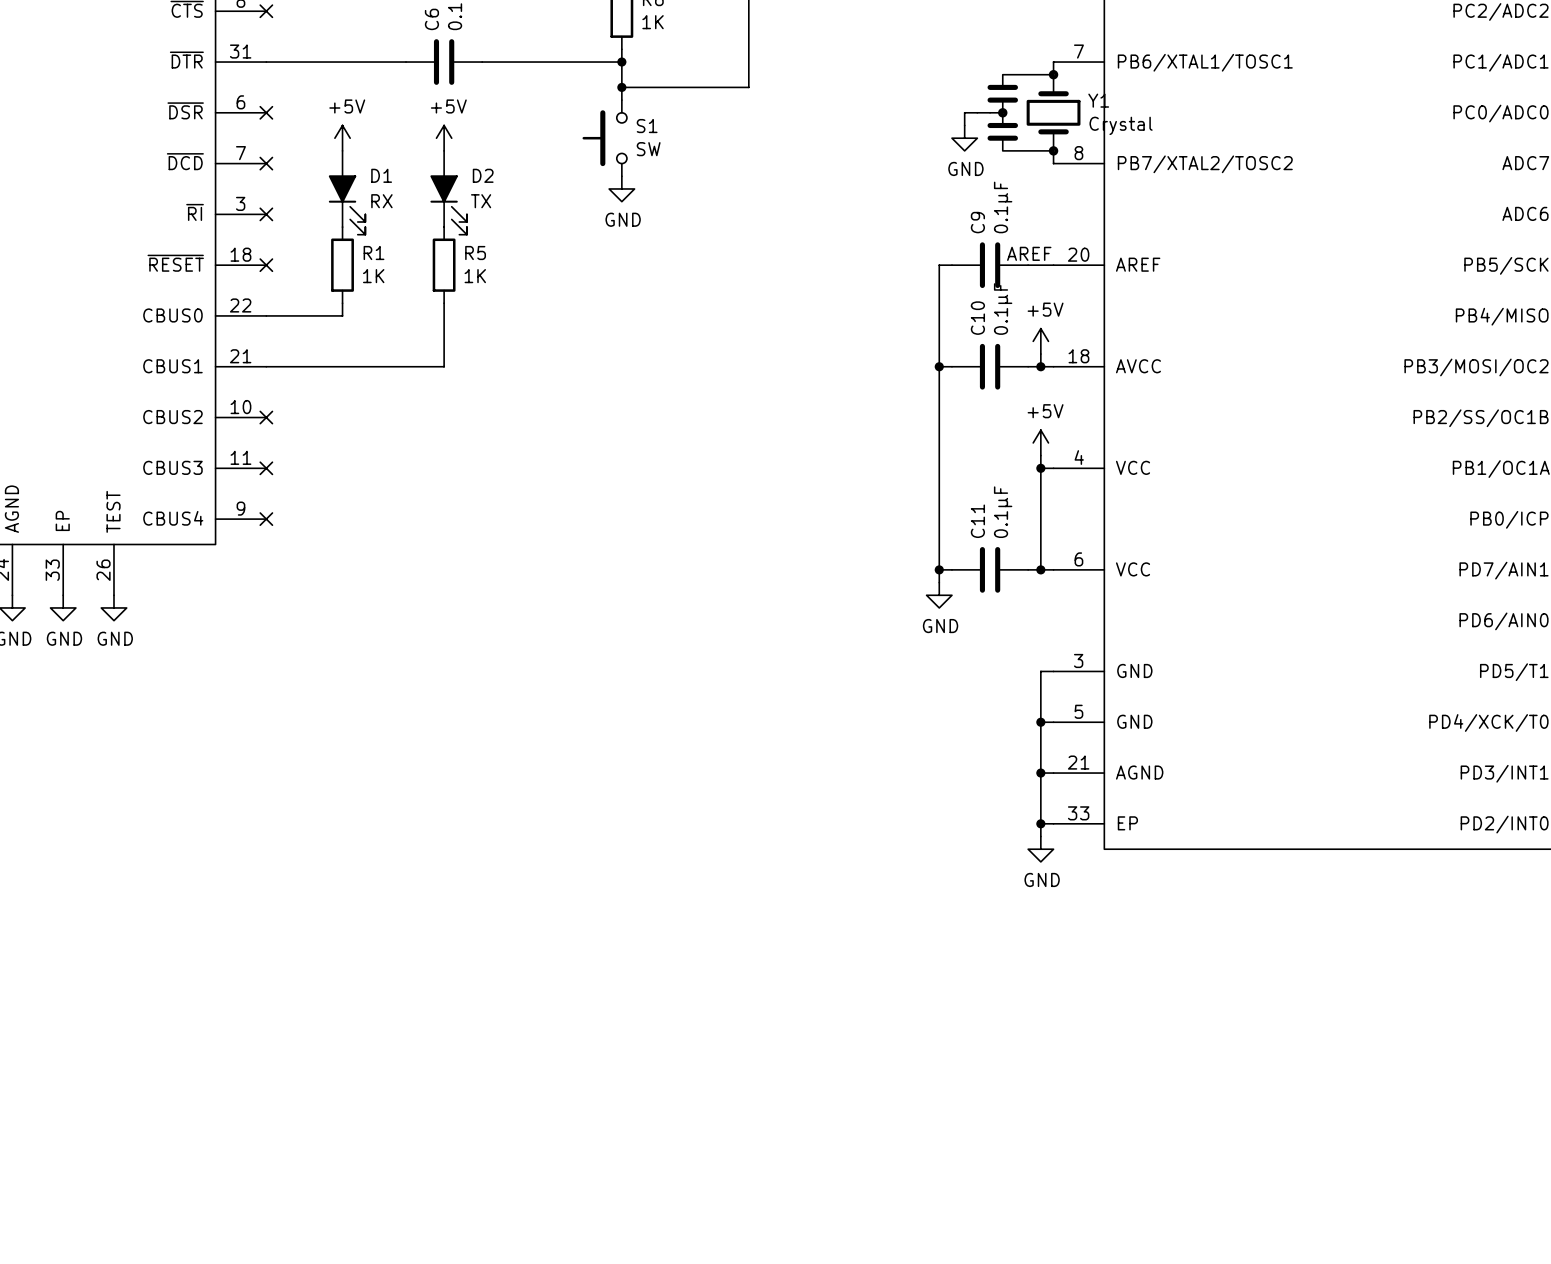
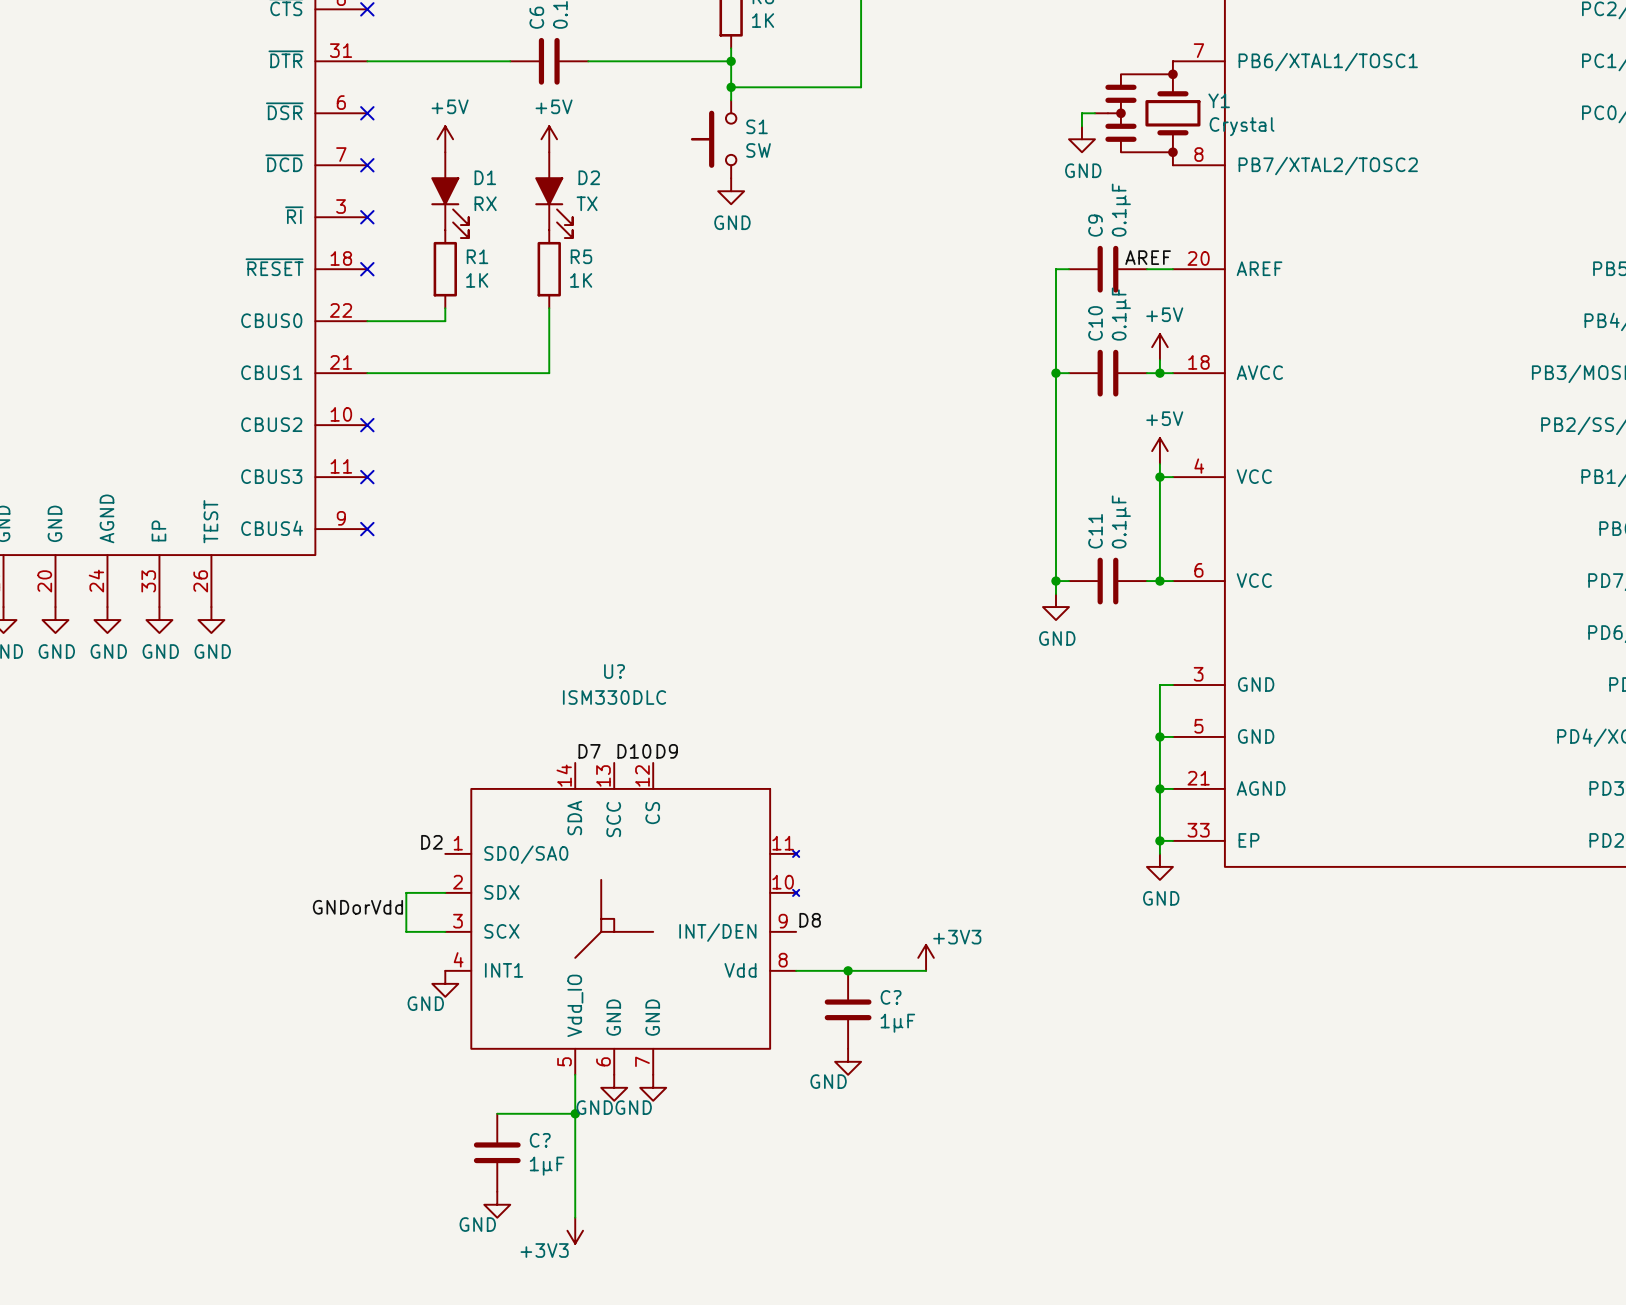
label: none -> D7 (589, 751)
label: none -> D10 (634, 751)
label: none -> D9 (667, 751)
label: none -> D2 (431, 842)
wire: none -> (445, 892) (406, 892) (406, 931) (445, 931)
label: none -> GNDorVdd (357, 907)
U?: none -> ISM330DLC (622, 918)
label: none -> D8 (810, 920)
power symbol: none -> +3V3 (926, 957)
wire: none -> (796, 970) (926, 970)
junction: none -> (848, 970)
power symbol: none -> GND (445, 983)
C?: none -> 1µF (848, 1009)
power symbol: none -> GND (848, 1061)
wire: none -> (575, 1074) (575, 1217)
power symbol: none -> GND (614, 1087)
power symbol: none -> GND (653, 1087)
wire: none -> (497, 1113) (575, 1113)
junction: none -> (575, 1113)
C?: none -> 1µF (497, 1152)
power symbol: none -> GND (497, 1204)
power symbol: none -> +3V3 (575, 1230)

